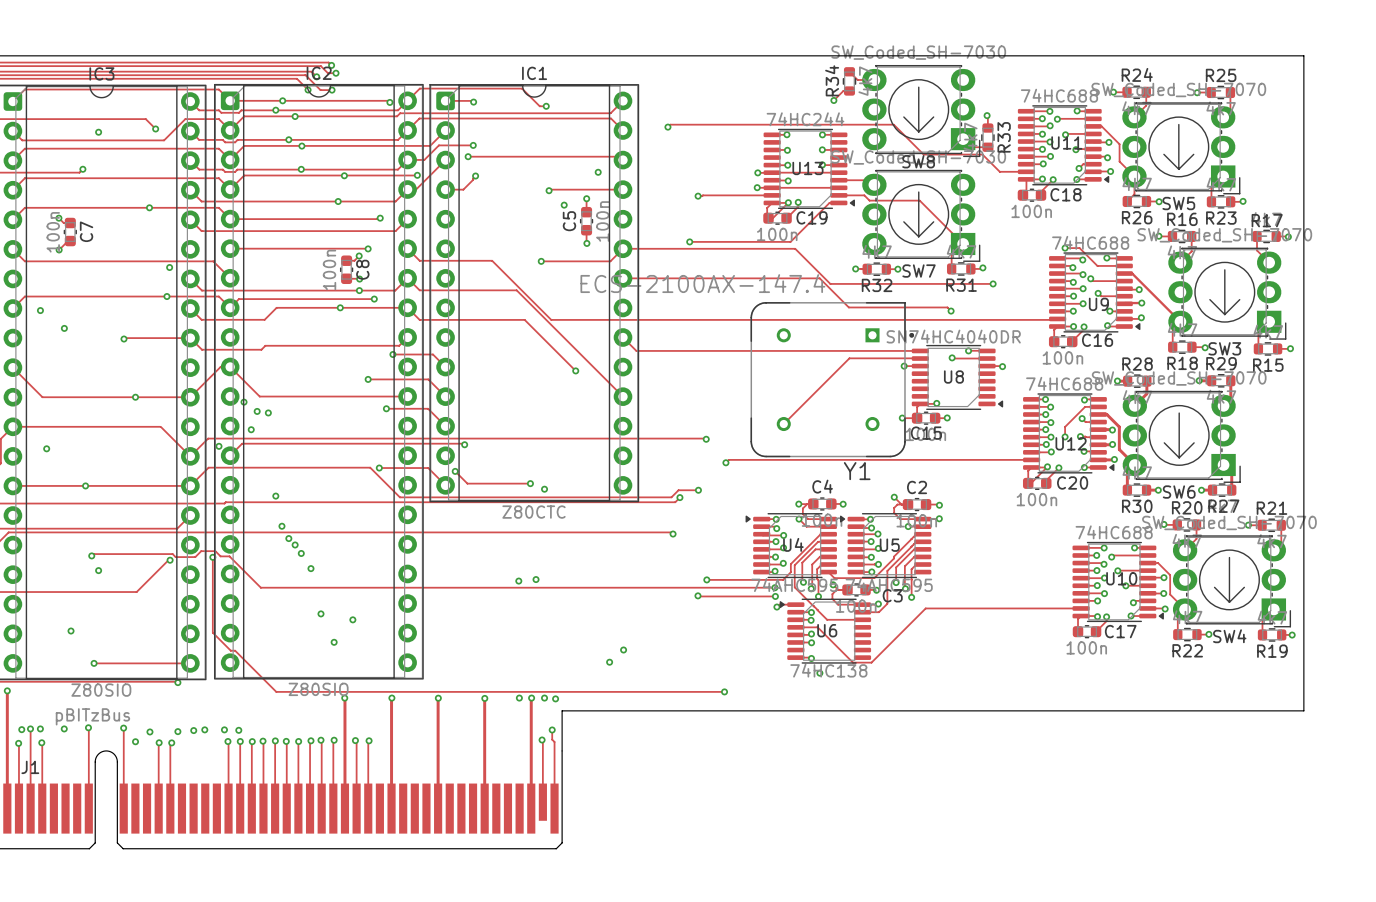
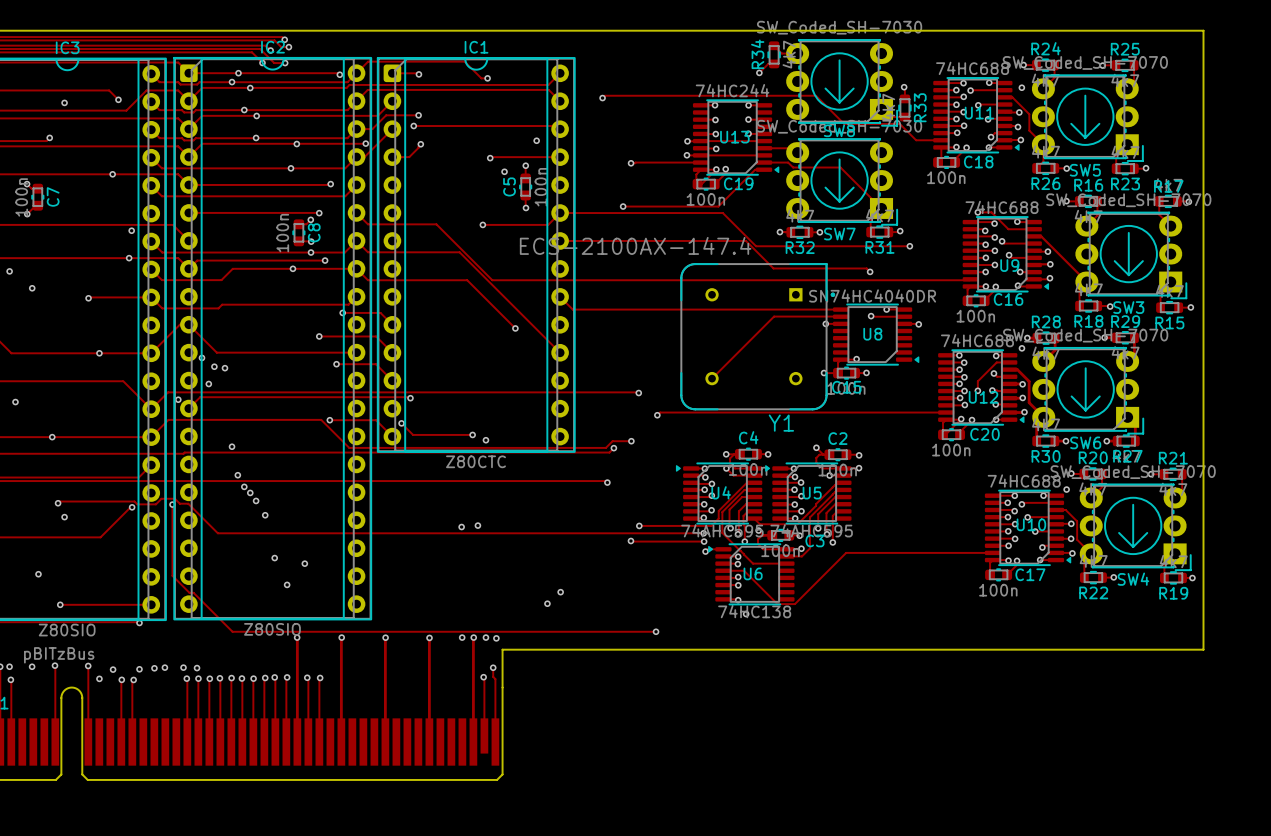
via: none -> (1021, 87)
via: none -> (1021, 348)
via: none -> (1066, 489)

